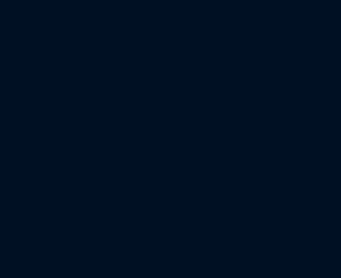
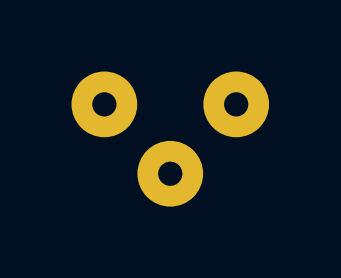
part: none -> (170, 139)

